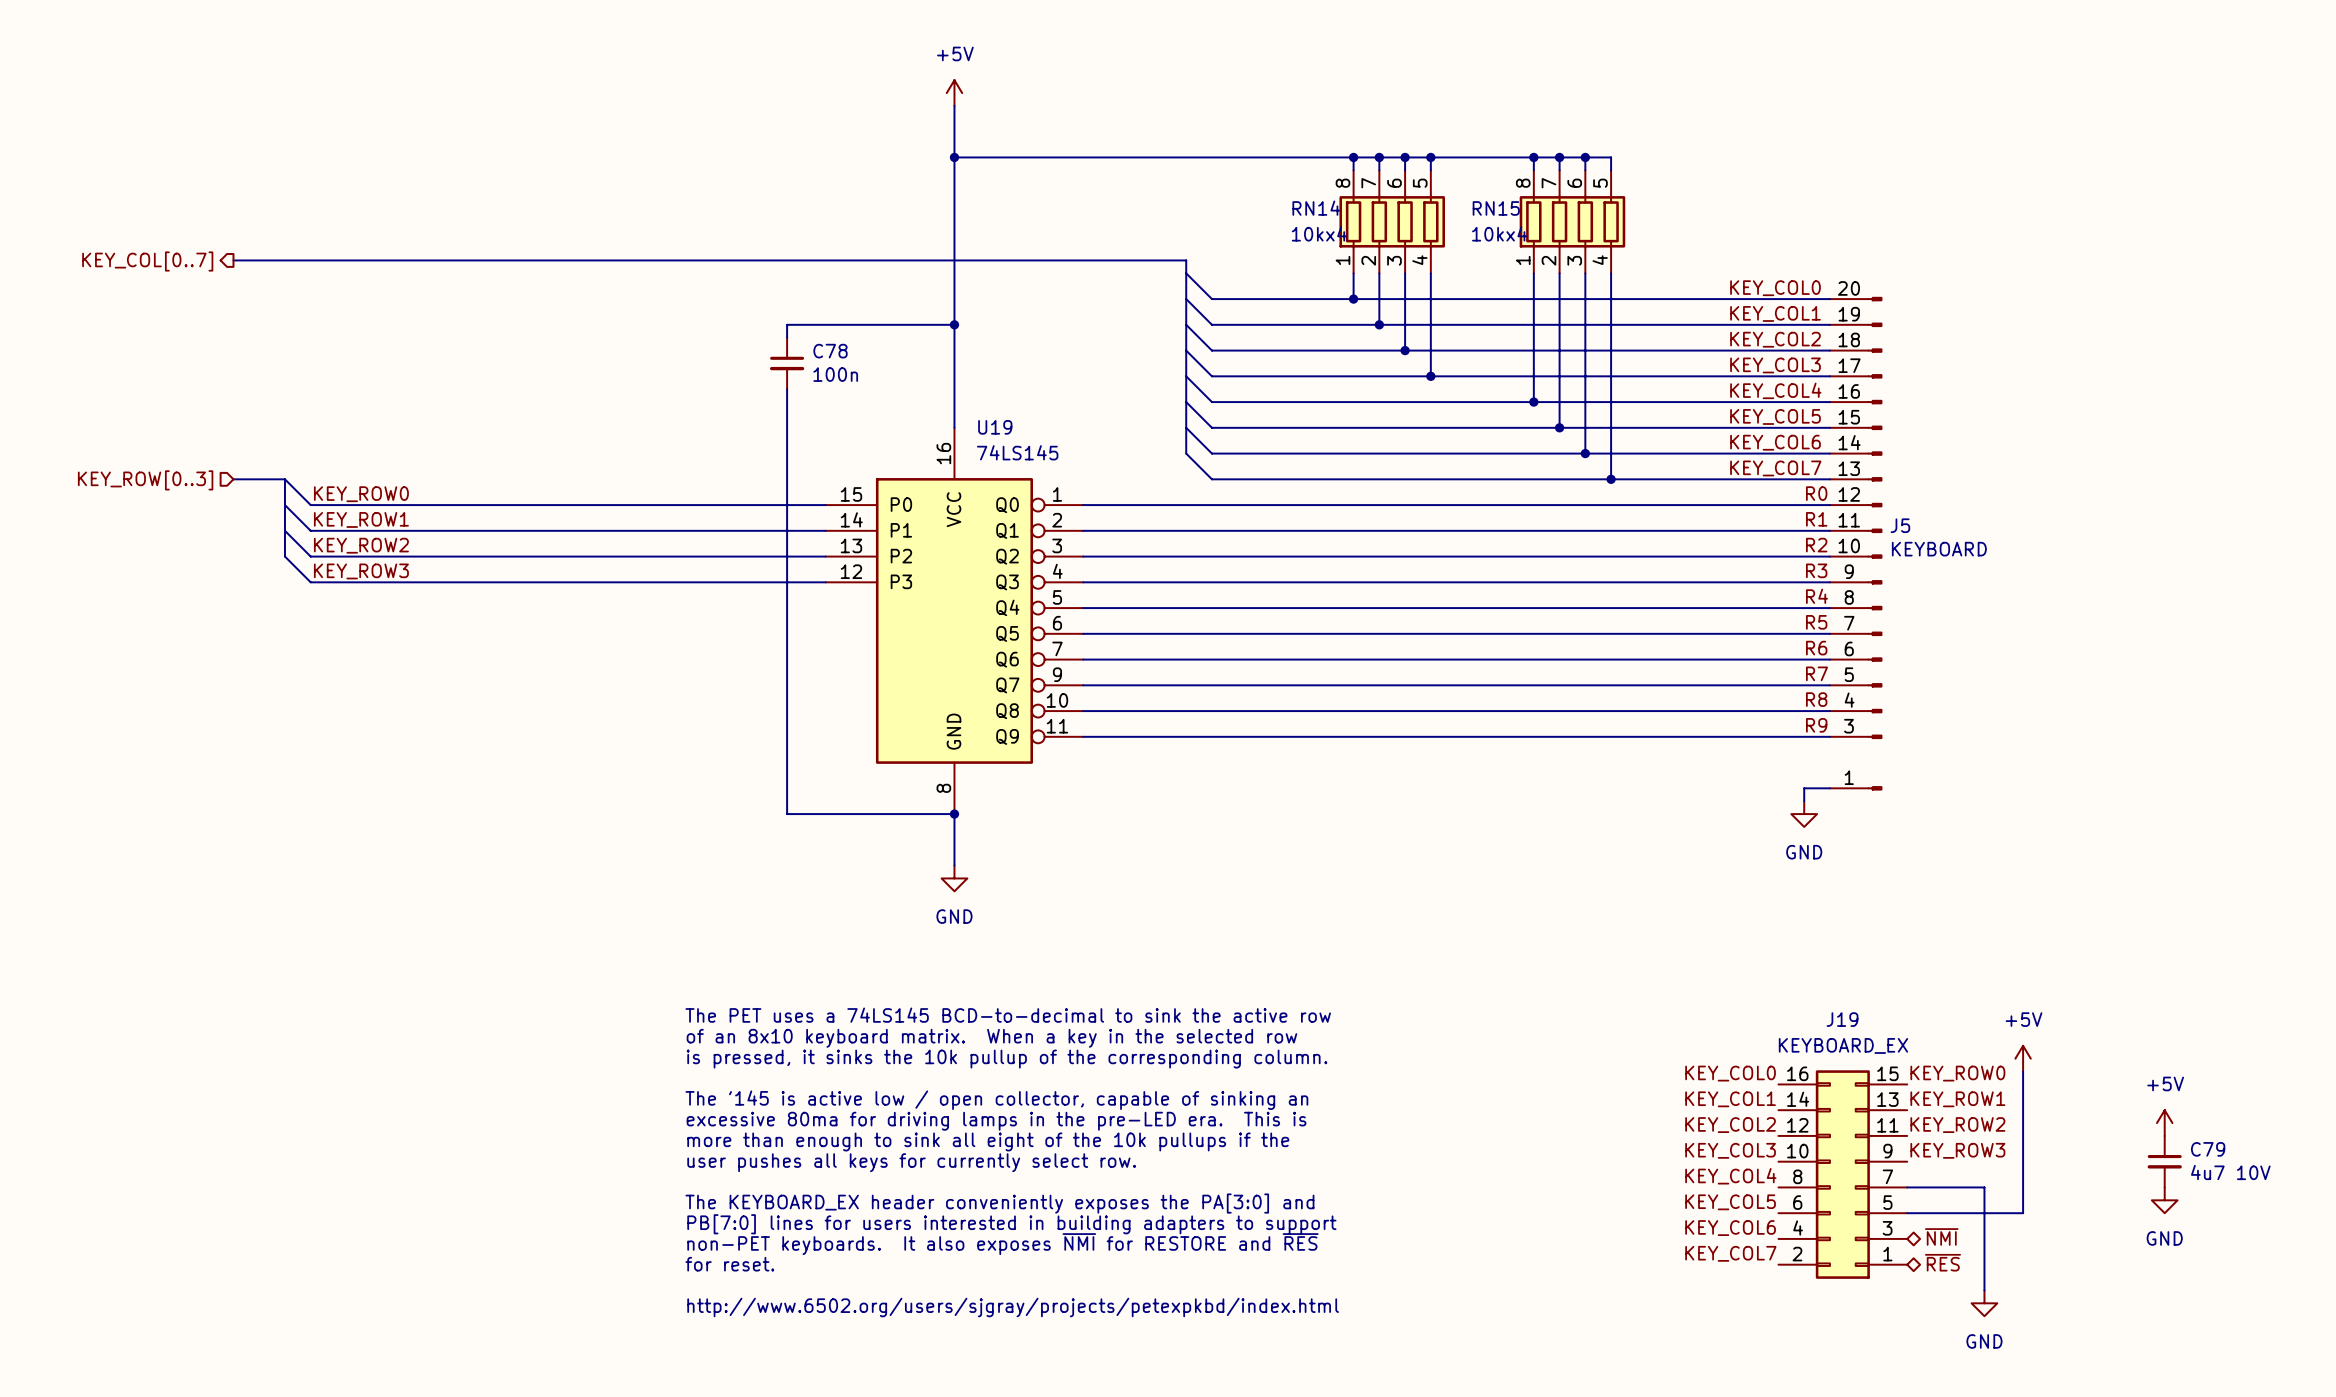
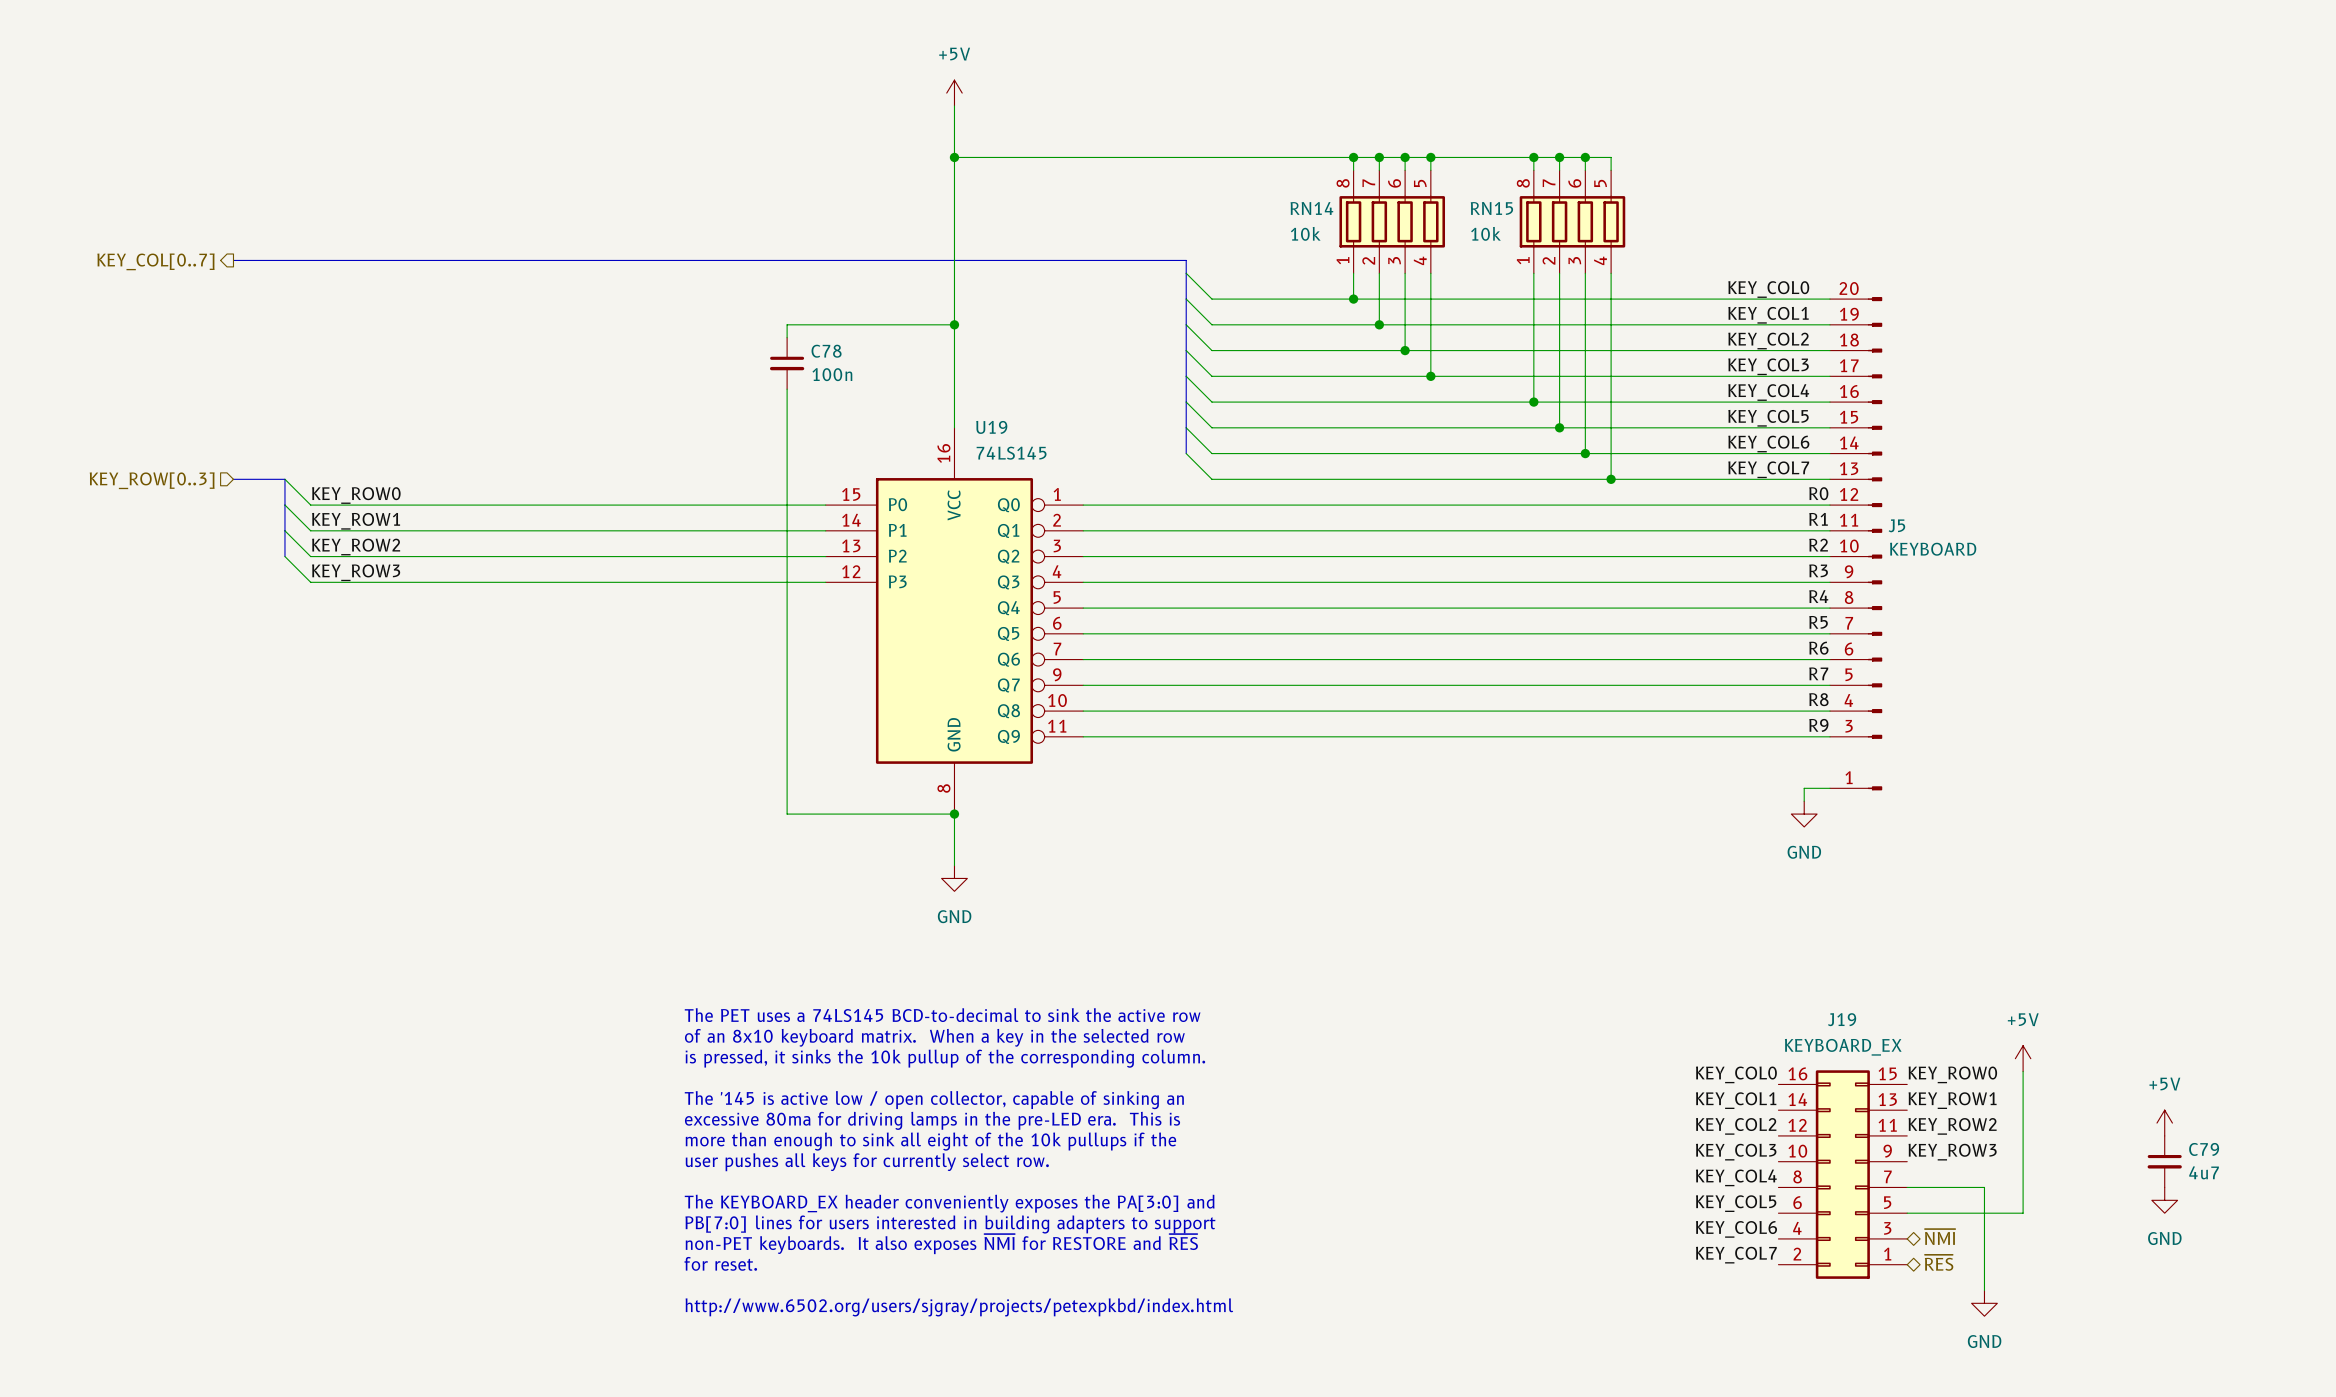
RN14 value: 10kx4 (1319, 233) -> 10k (1305, 233)
RN15 value: 10kx4 (1499, 233) -> 10k (1485, 233)
C79 value: 4u7 10V (2230, 1172) -> 4u7 (2204, 1172)

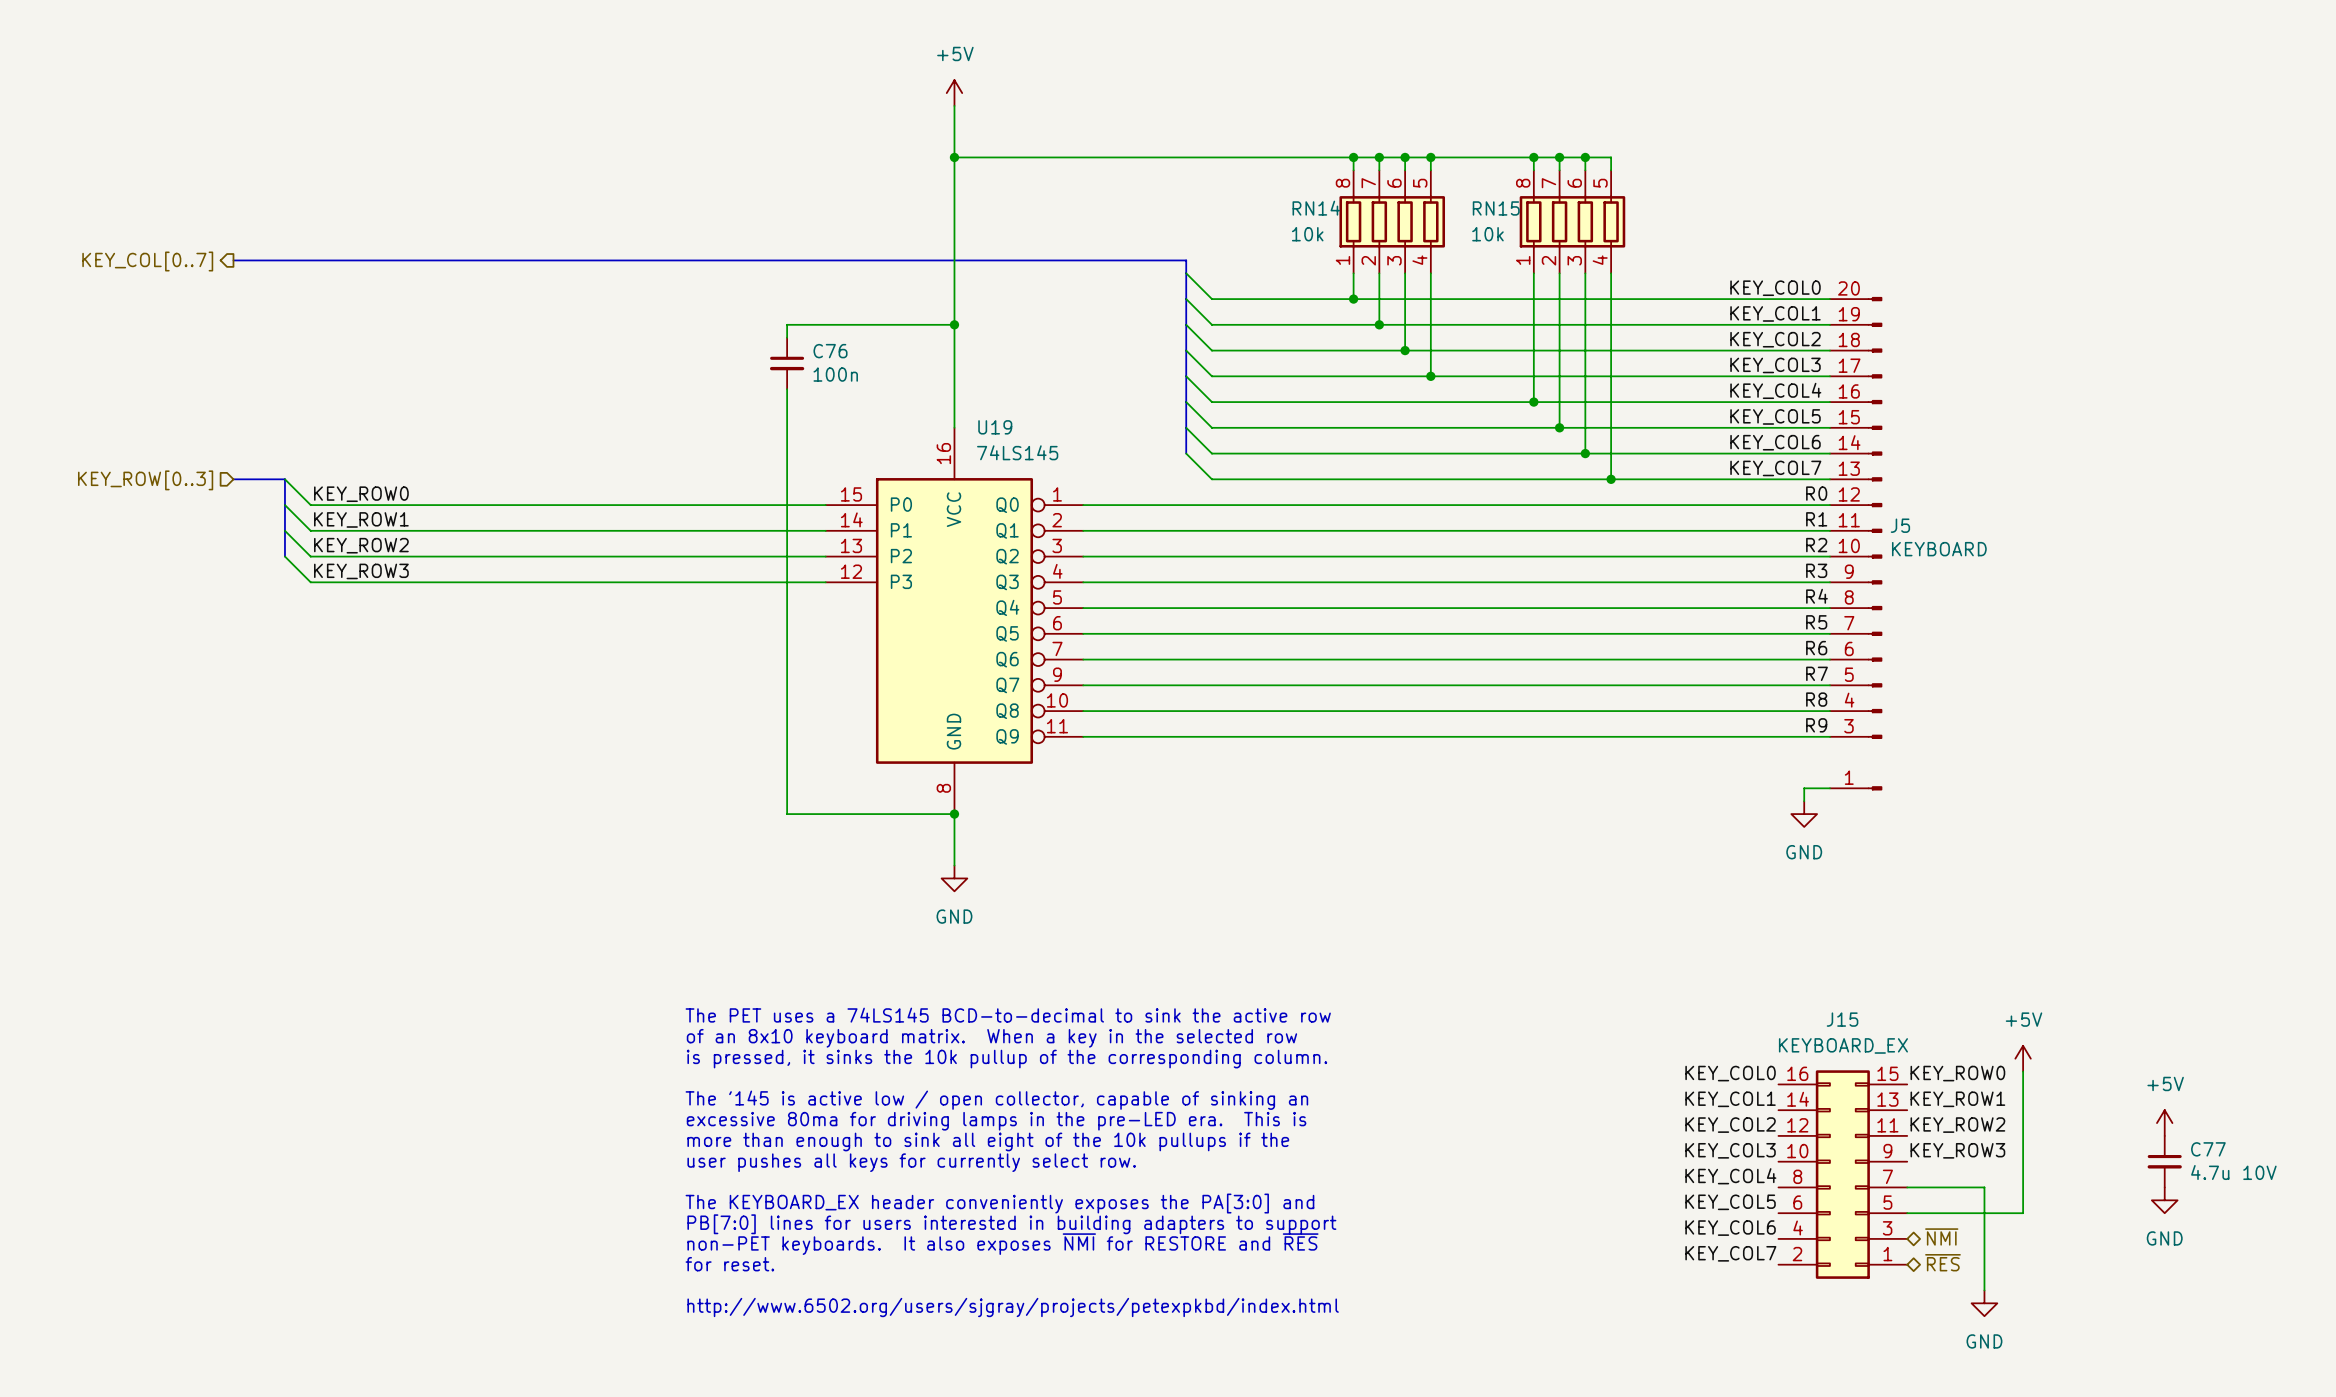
C78 name: C78 (826, 351) -> C76 (830, 351)
J19 name: J19 (1842, 1019) -> J15 (1842, 1019)
C79 name: C79 (2204, 1149) -> C77 (2208, 1149)
C79 value: 4u7 (2204, 1172) -> 4.7u 10V (2233, 1172)

